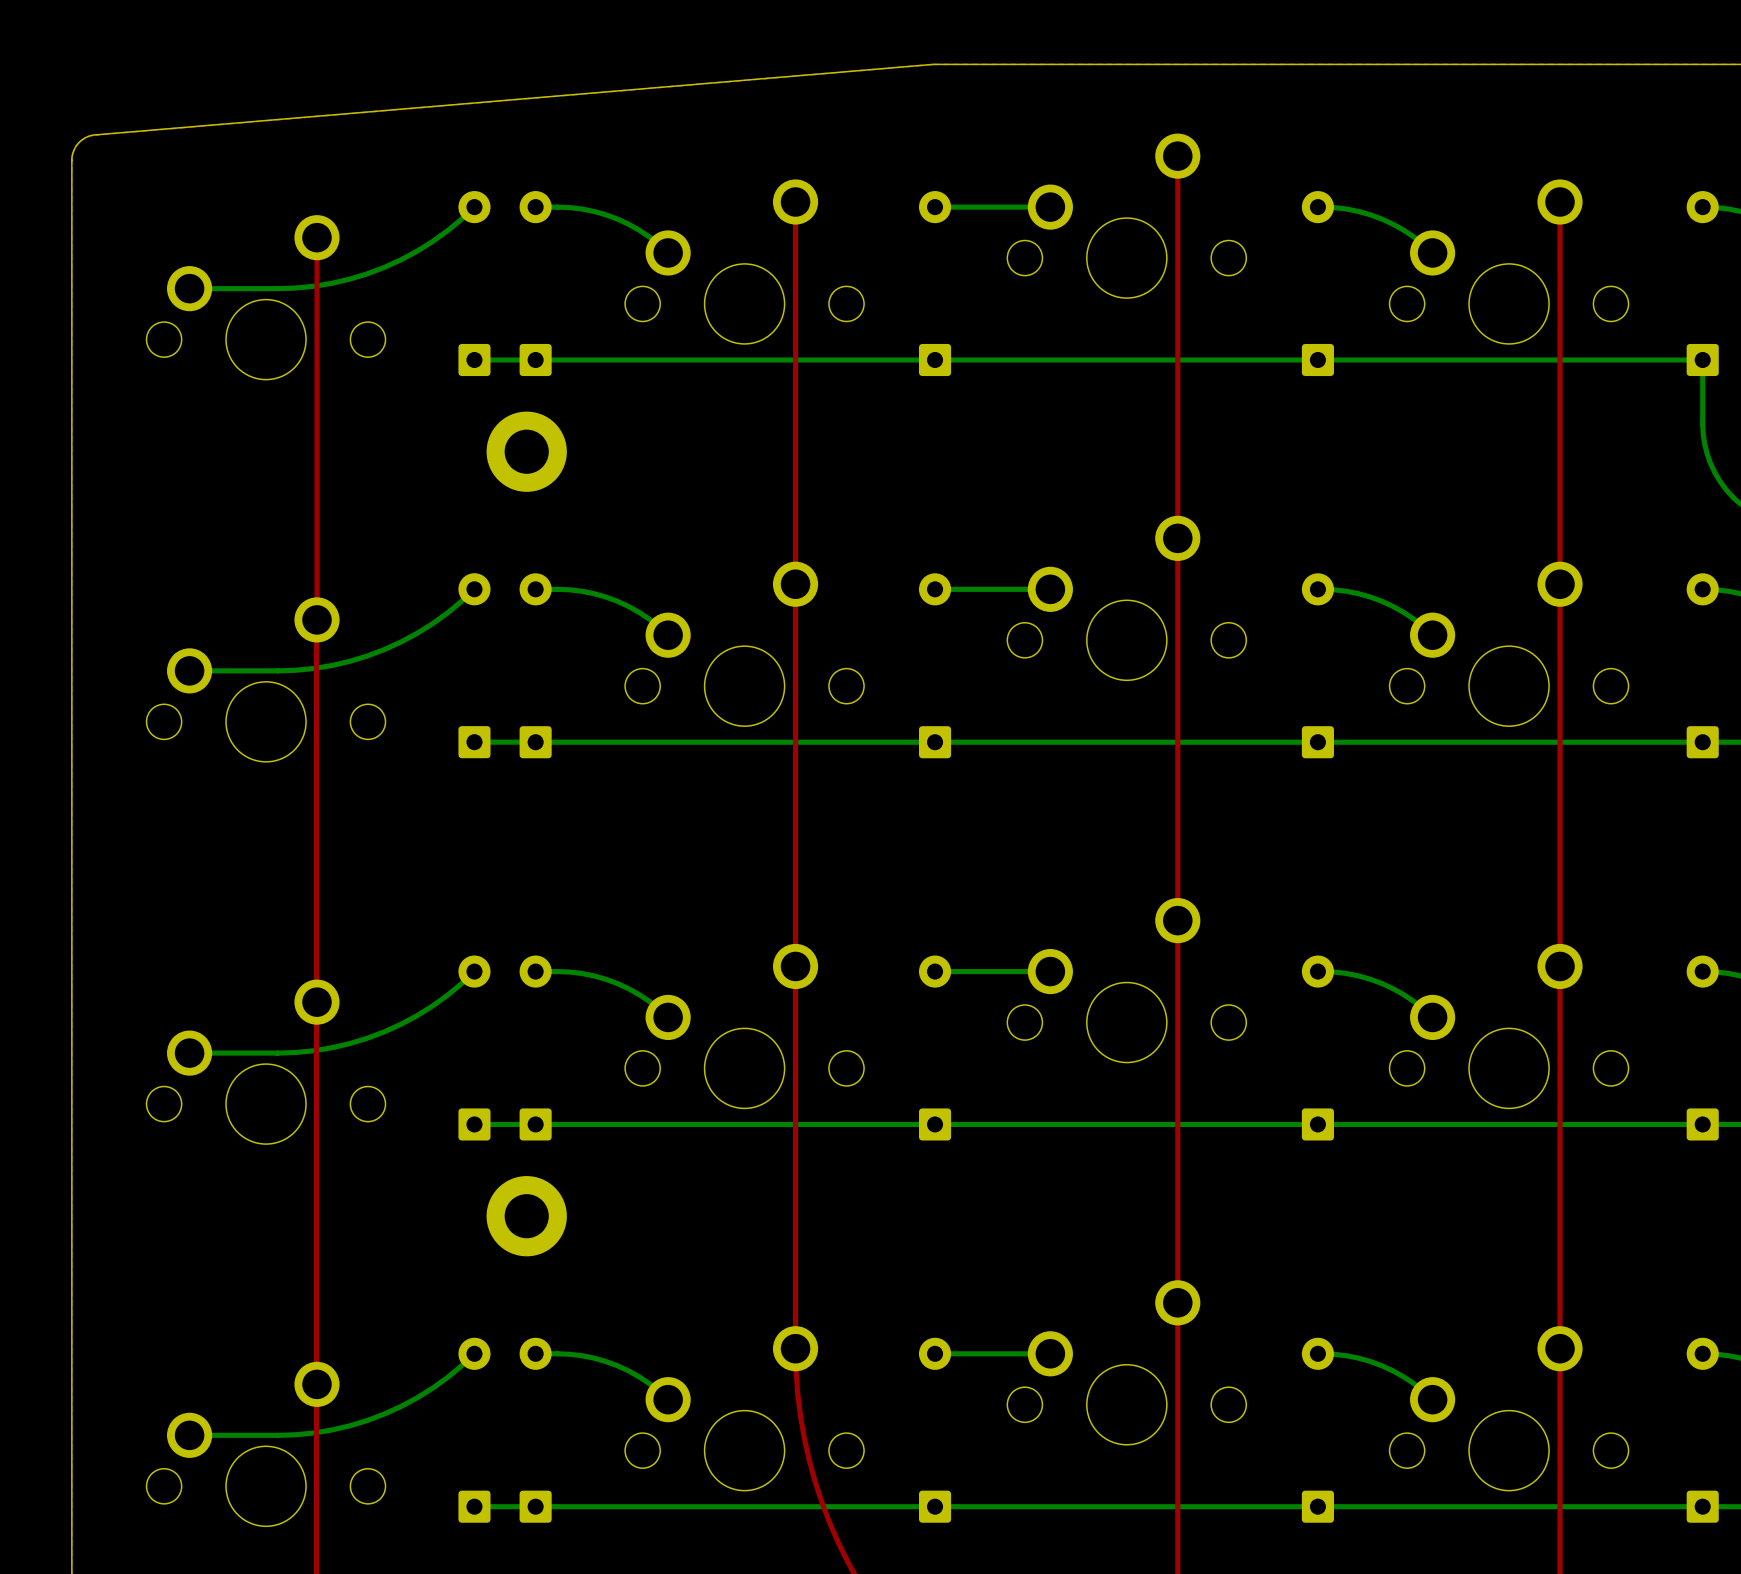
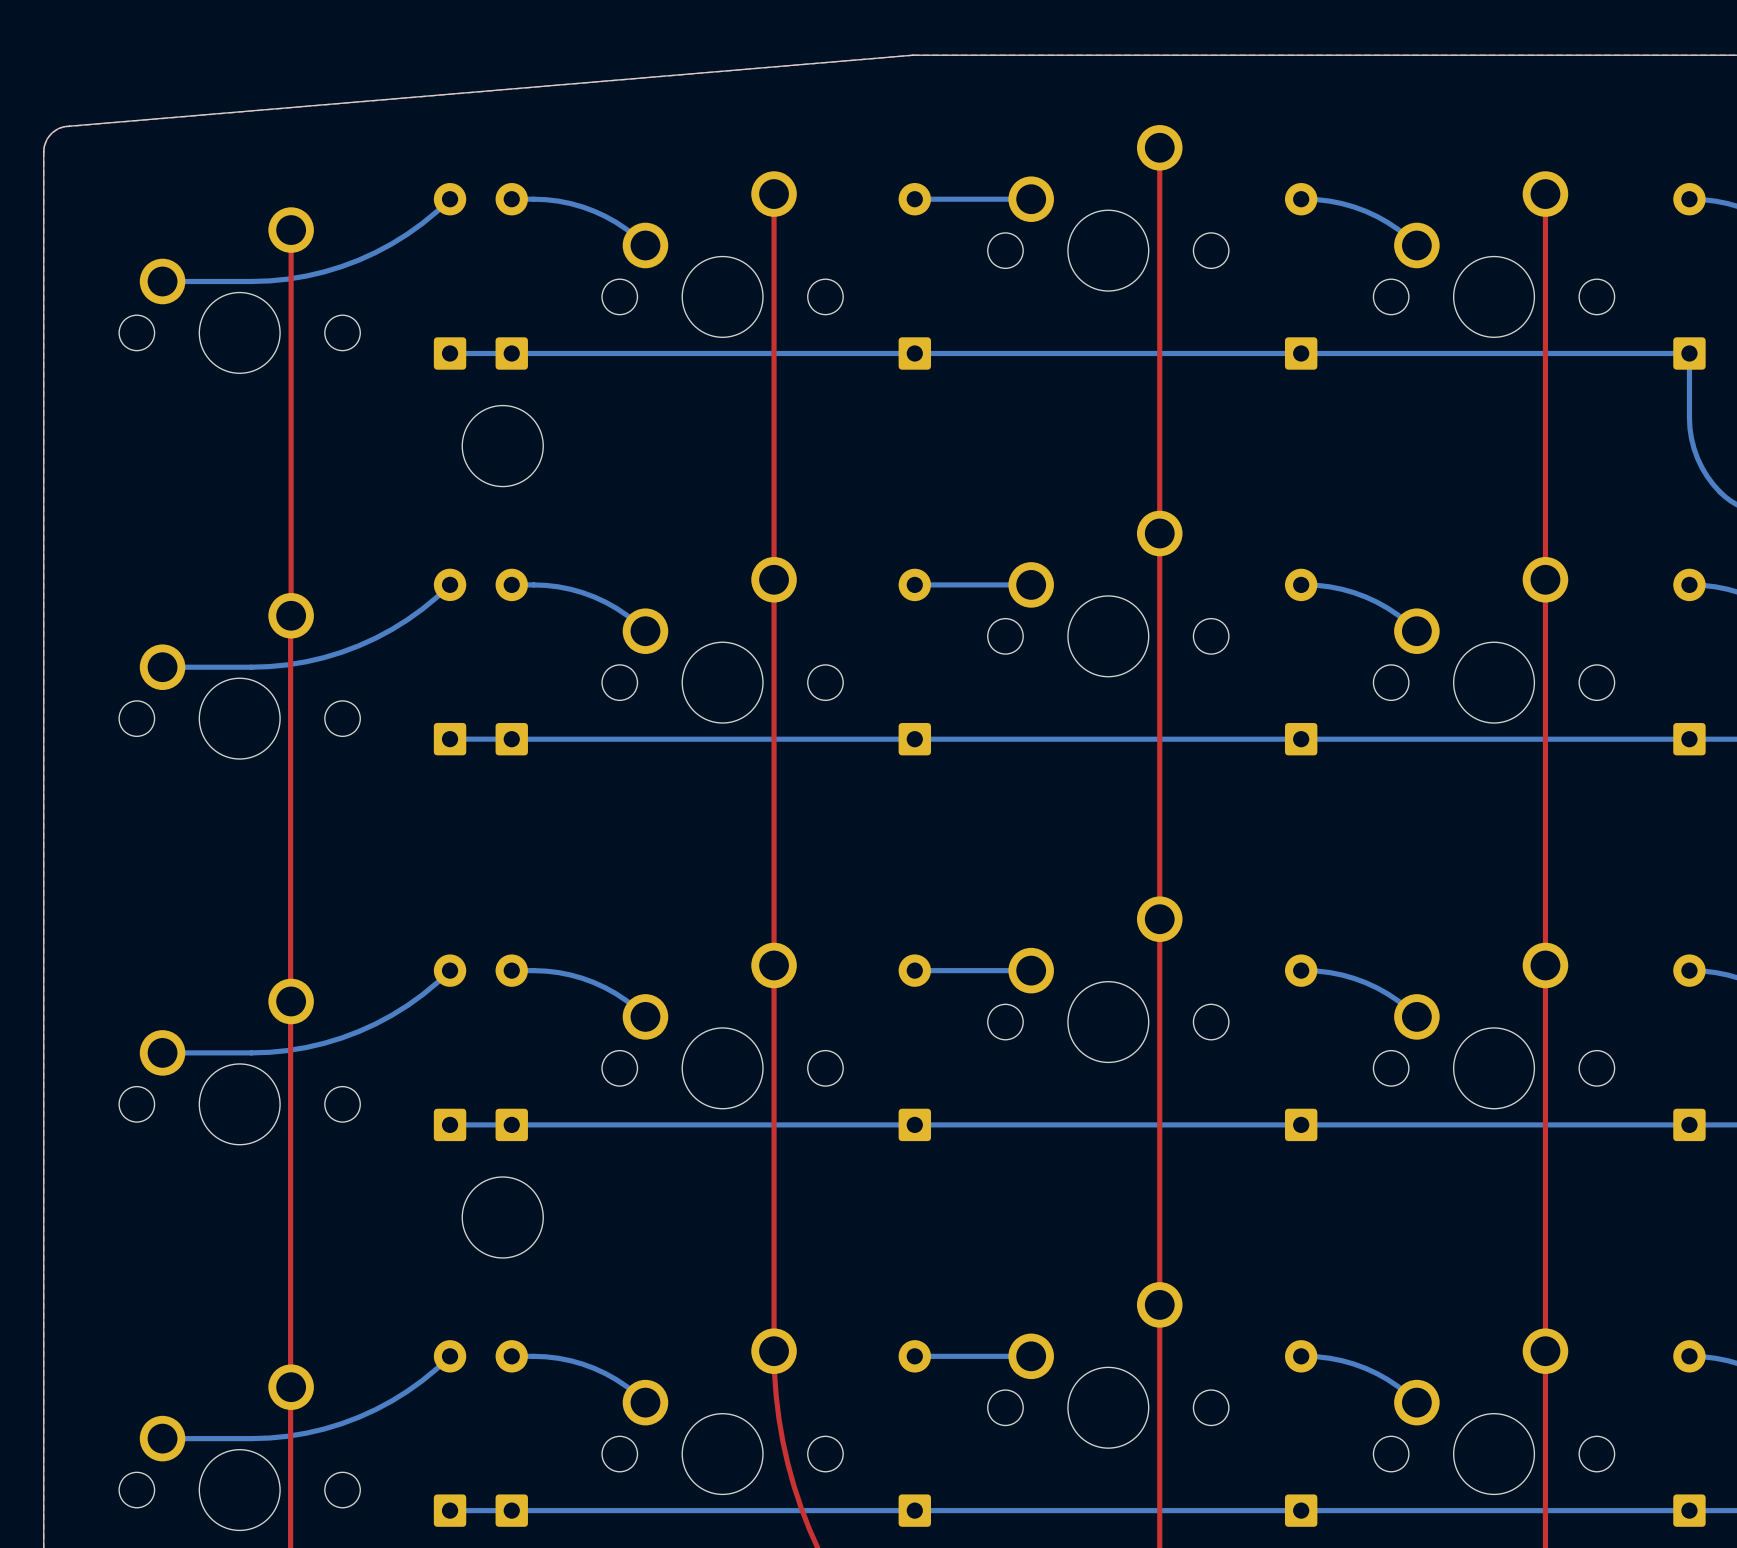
round board edge: none -> [461, 405, 544, 488]
part: (526, 451) -> none
round board edge: none -> [461, 1176, 544, 1259]
part: (526, 1216) -> none

